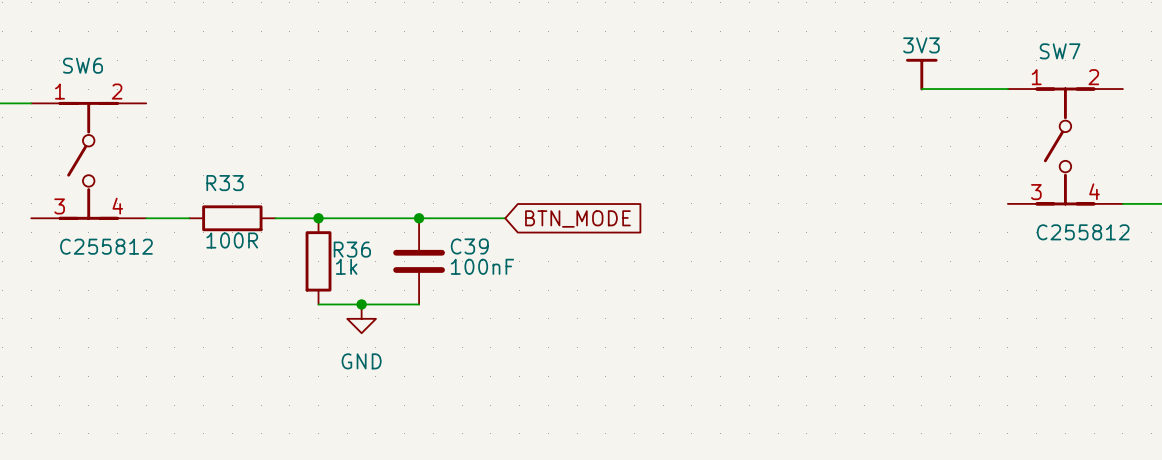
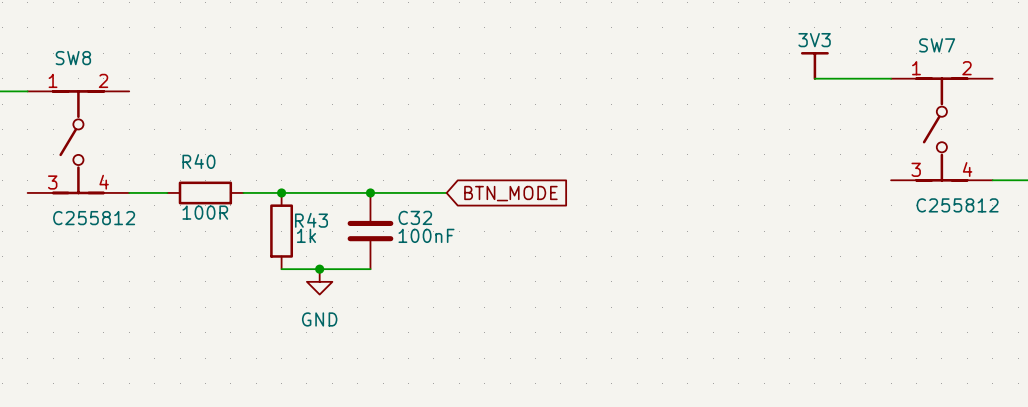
SW6 name: SW6 (83, 65) -> SW8 (73, 58)
R33 name: R33 (225, 183) -> R40 (198, 161)
C39 name: C39 (469, 246) -> C32 (415, 217)
R36 name: R36 (352, 249) -> R43 (311, 220)

